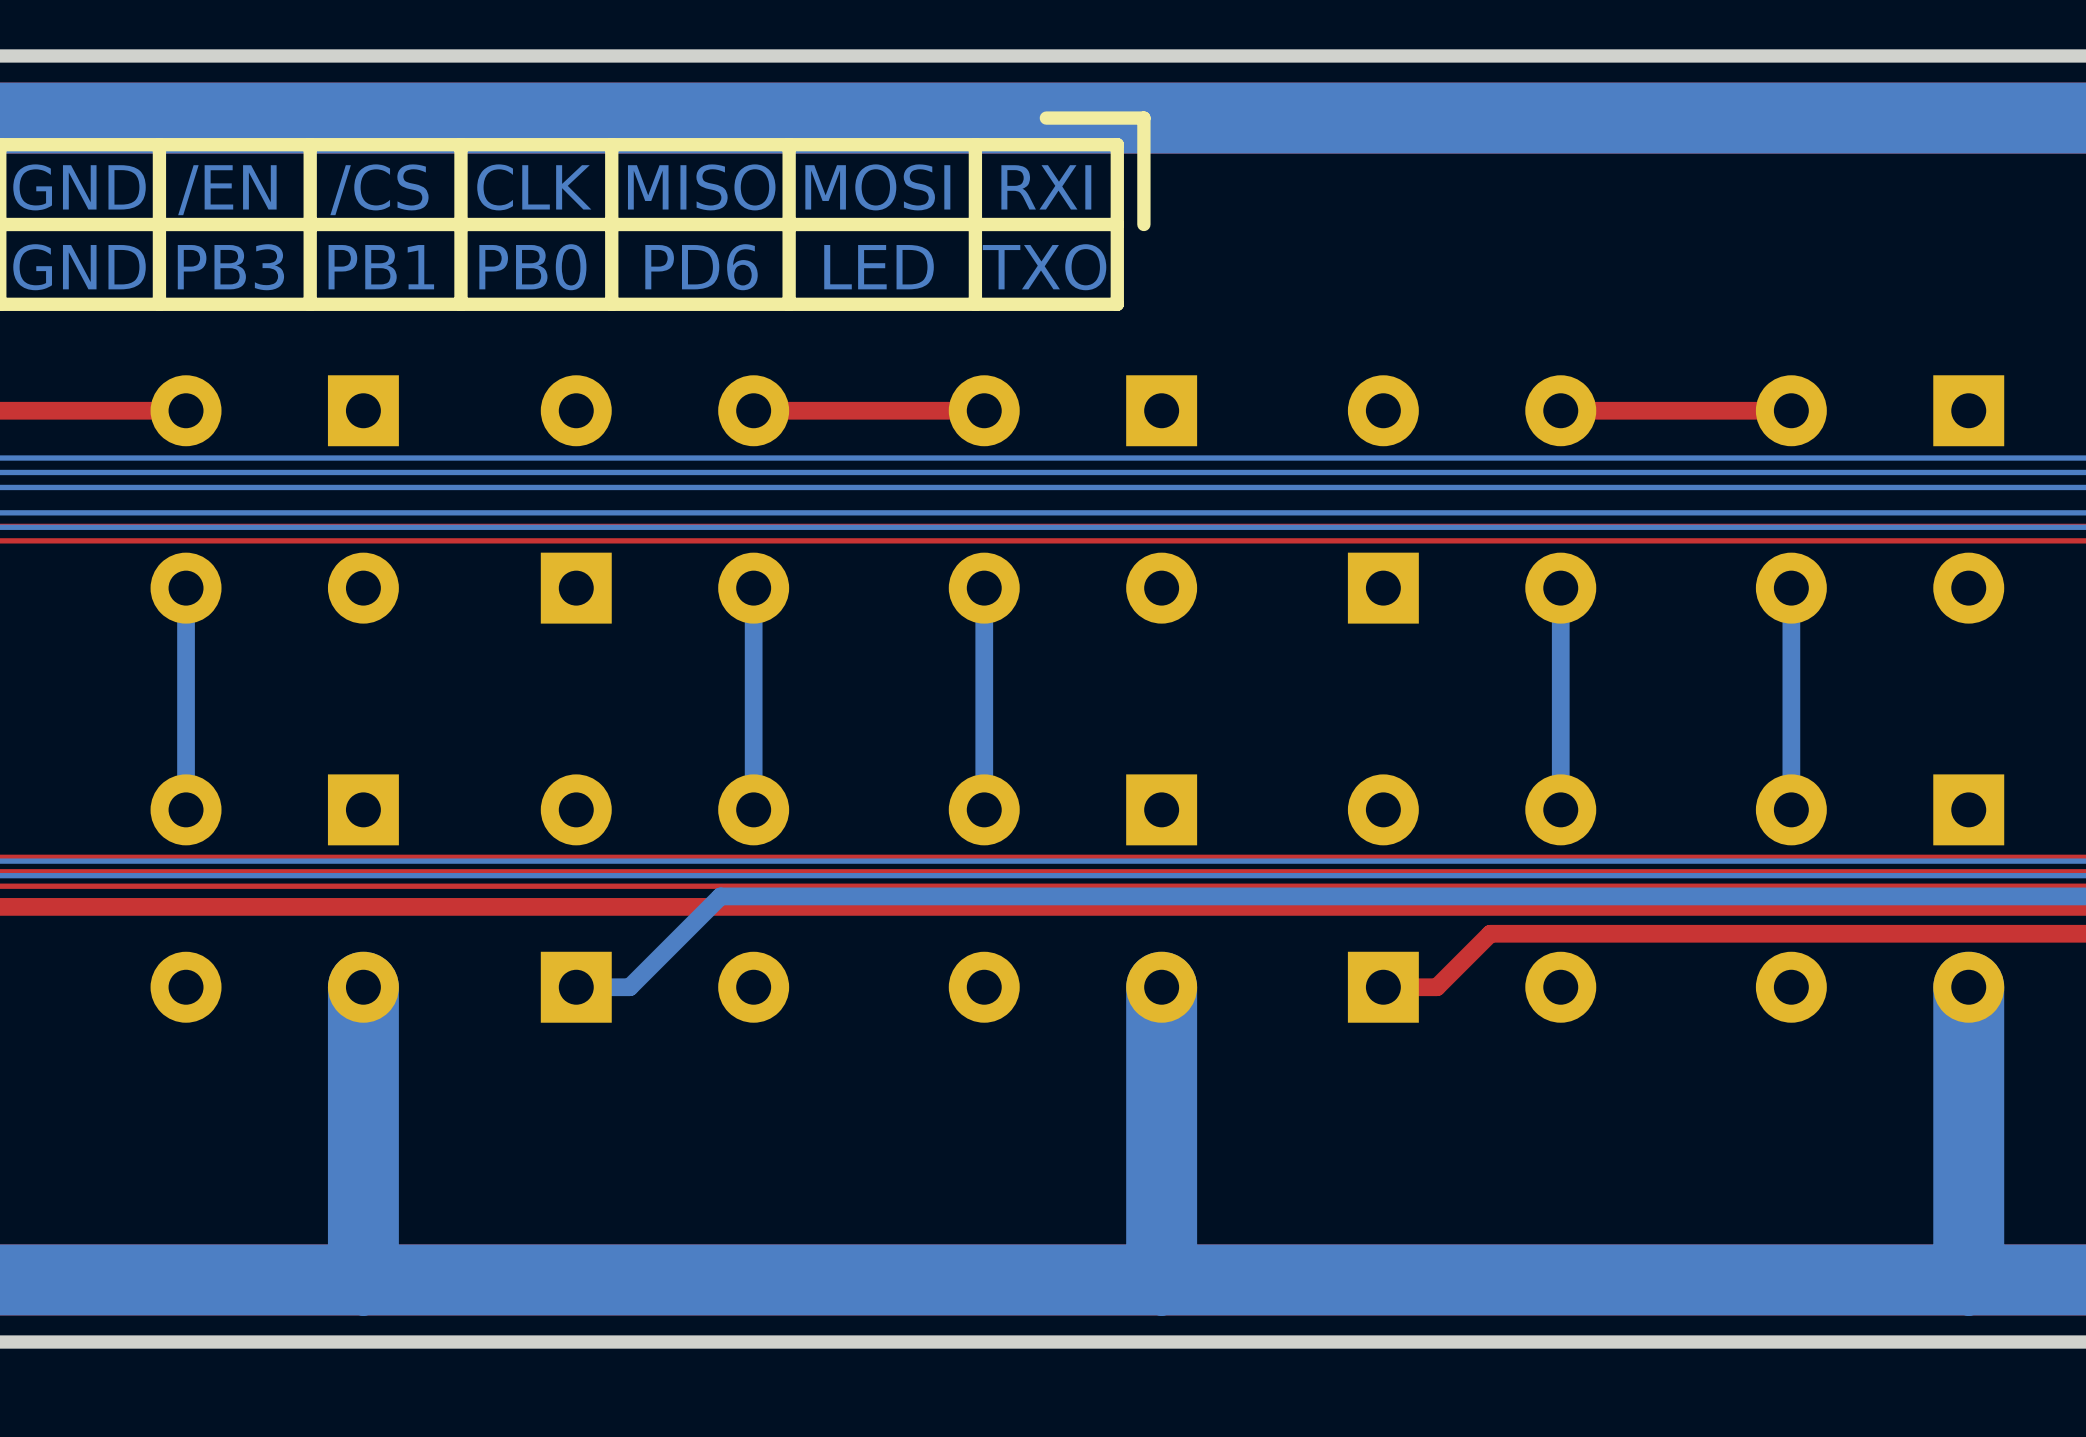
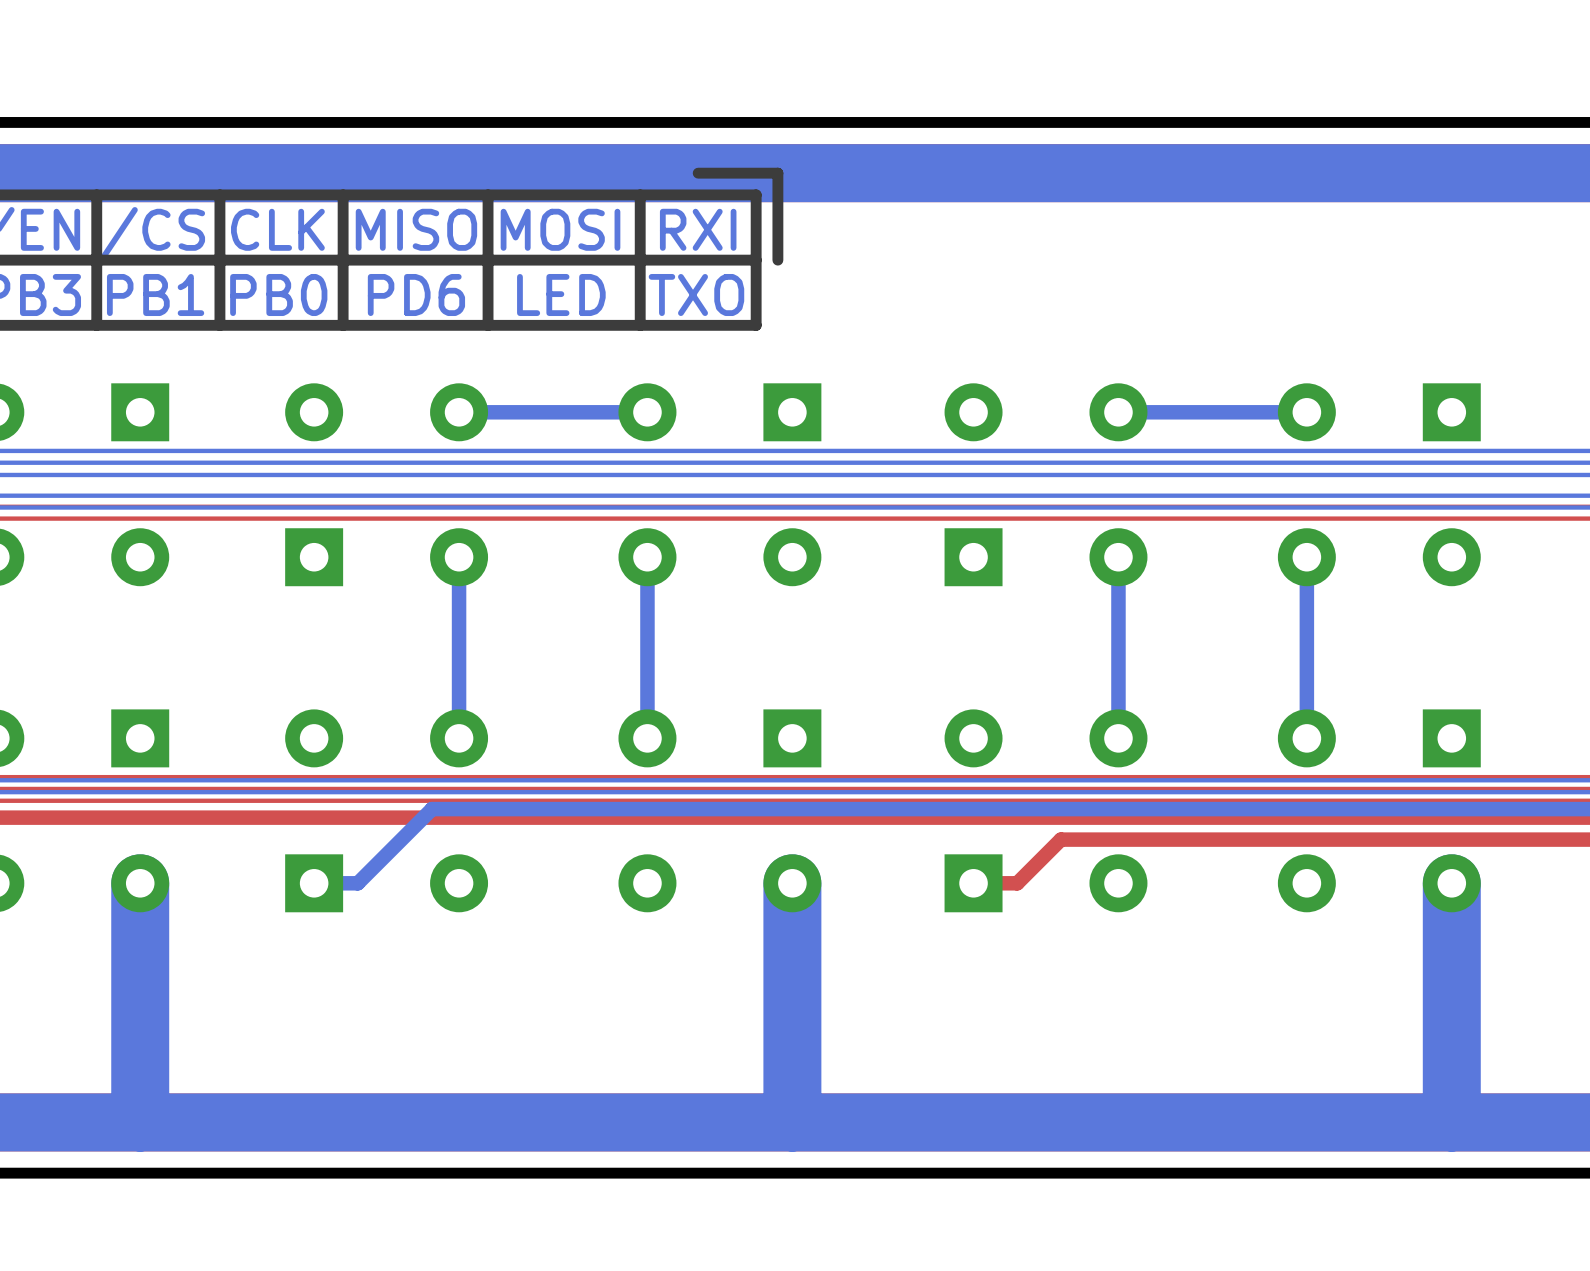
top track: (984, 410) (753, 410) -> none
bottom track: none -> (647, 412) (459, 412)
top track: (1791, 410) (1560, 410) -> none
bottom track: none -> (1306, 412) (1118, 412)

